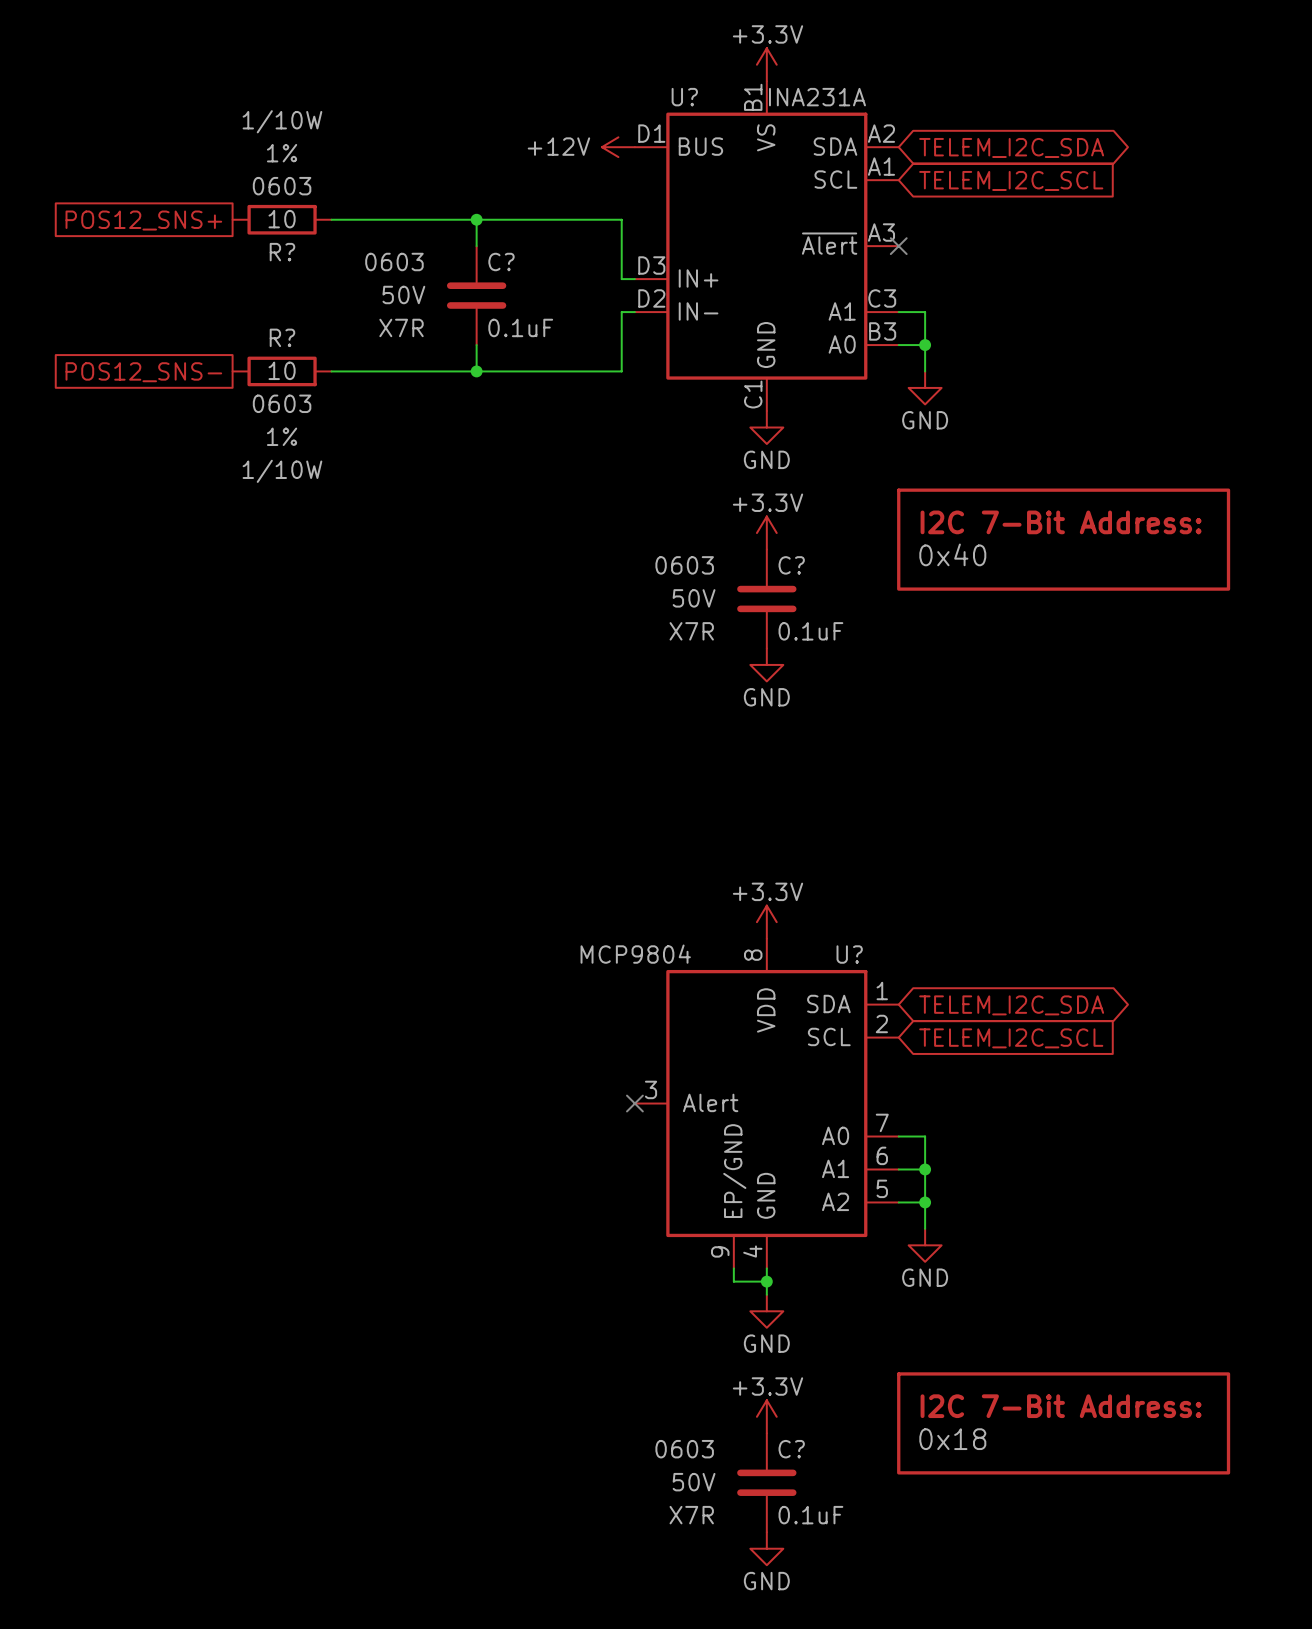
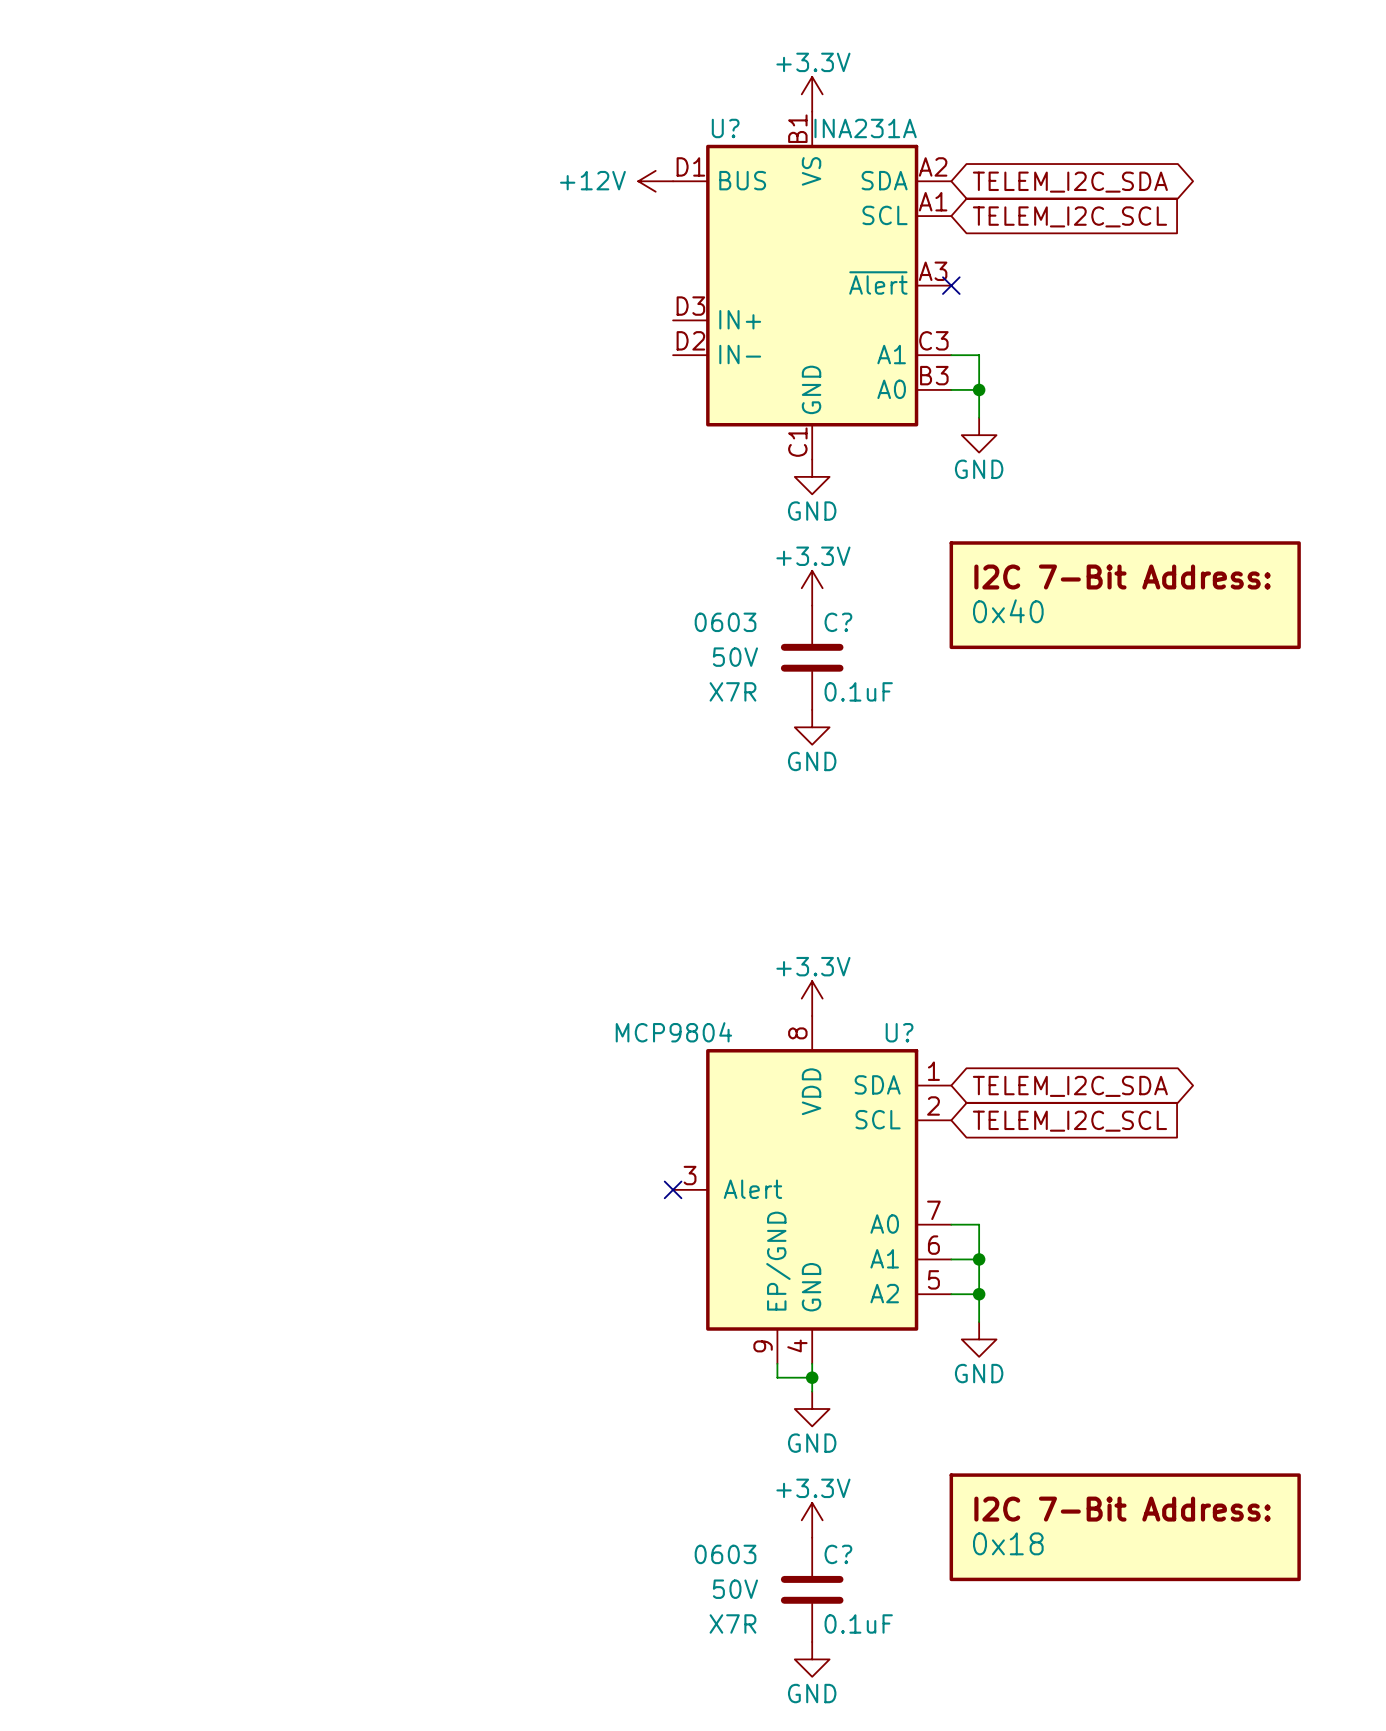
R?: 10 (282, 219) -> none
wire: (331, 219) (621, 219) (621, 279) (634, 279) -> none
wire: (476, 219) (476, 246) -> none
junction: (476, 219) -> none
global label: POS12_SNS+ (143, 220) -> none
C?: 0.1uF (476, 295) -> none
wire: (634, 312) (621, 312) (621, 371) (331, 371) -> none
wire: (476, 345) (476, 371) -> none
R?: 10 (282, 371) -> none
junction: (476, 371) -> none
global label: POS12_SNS- (143, 372) -> none

